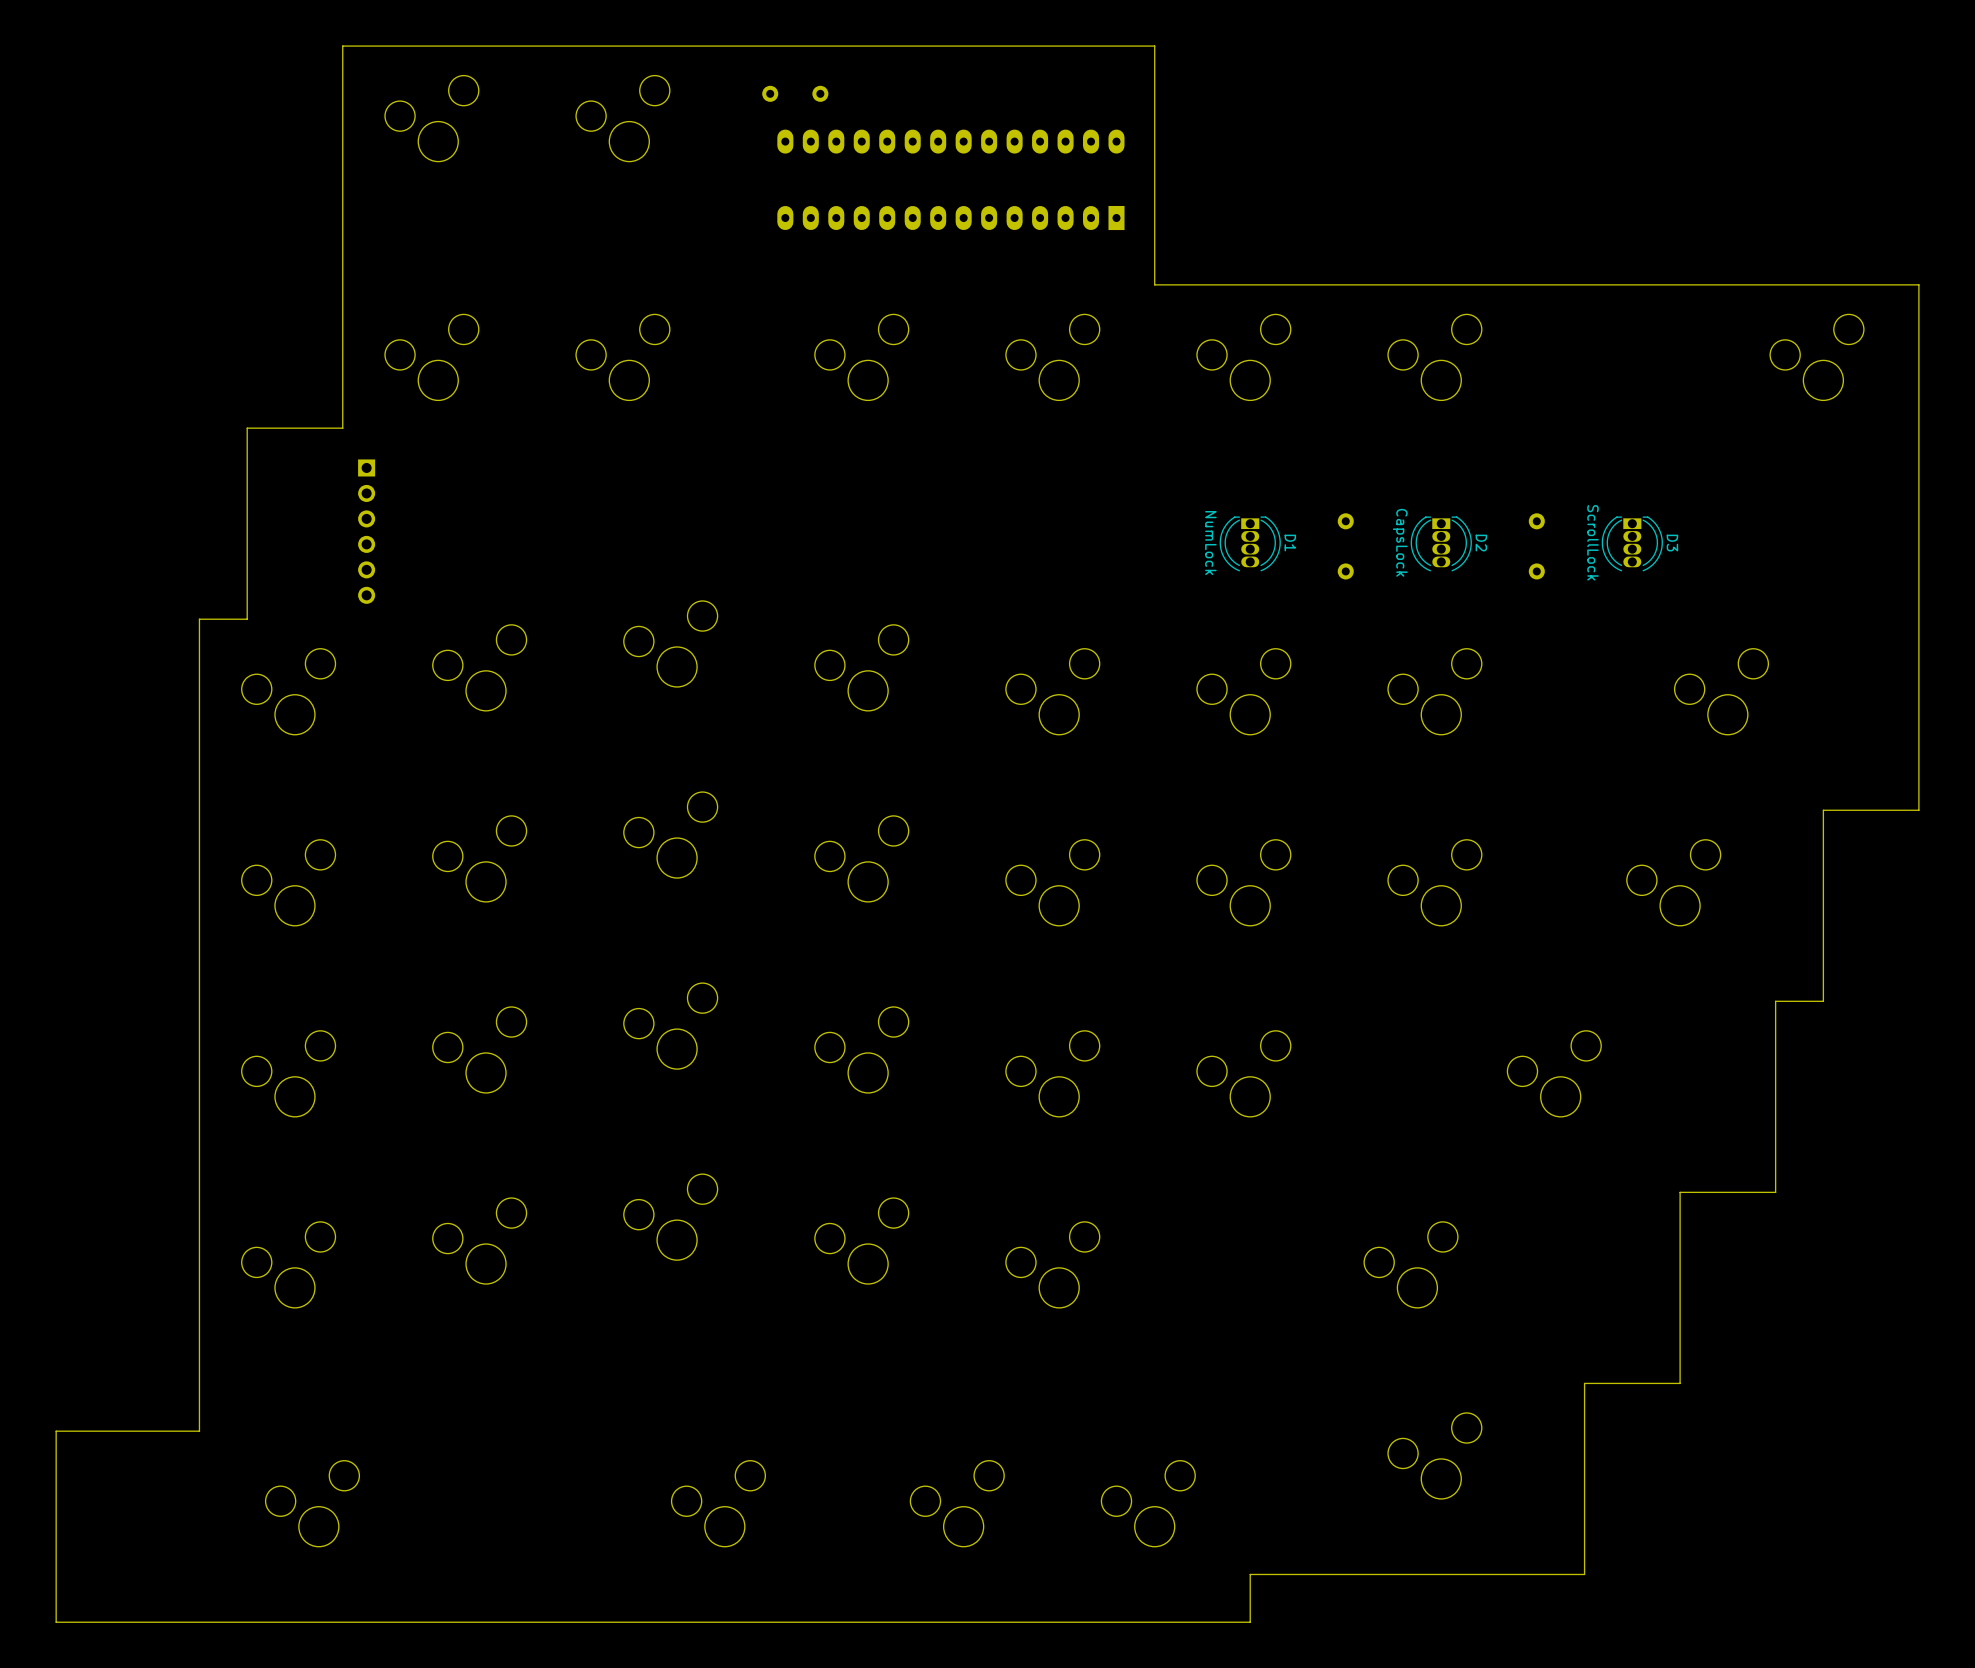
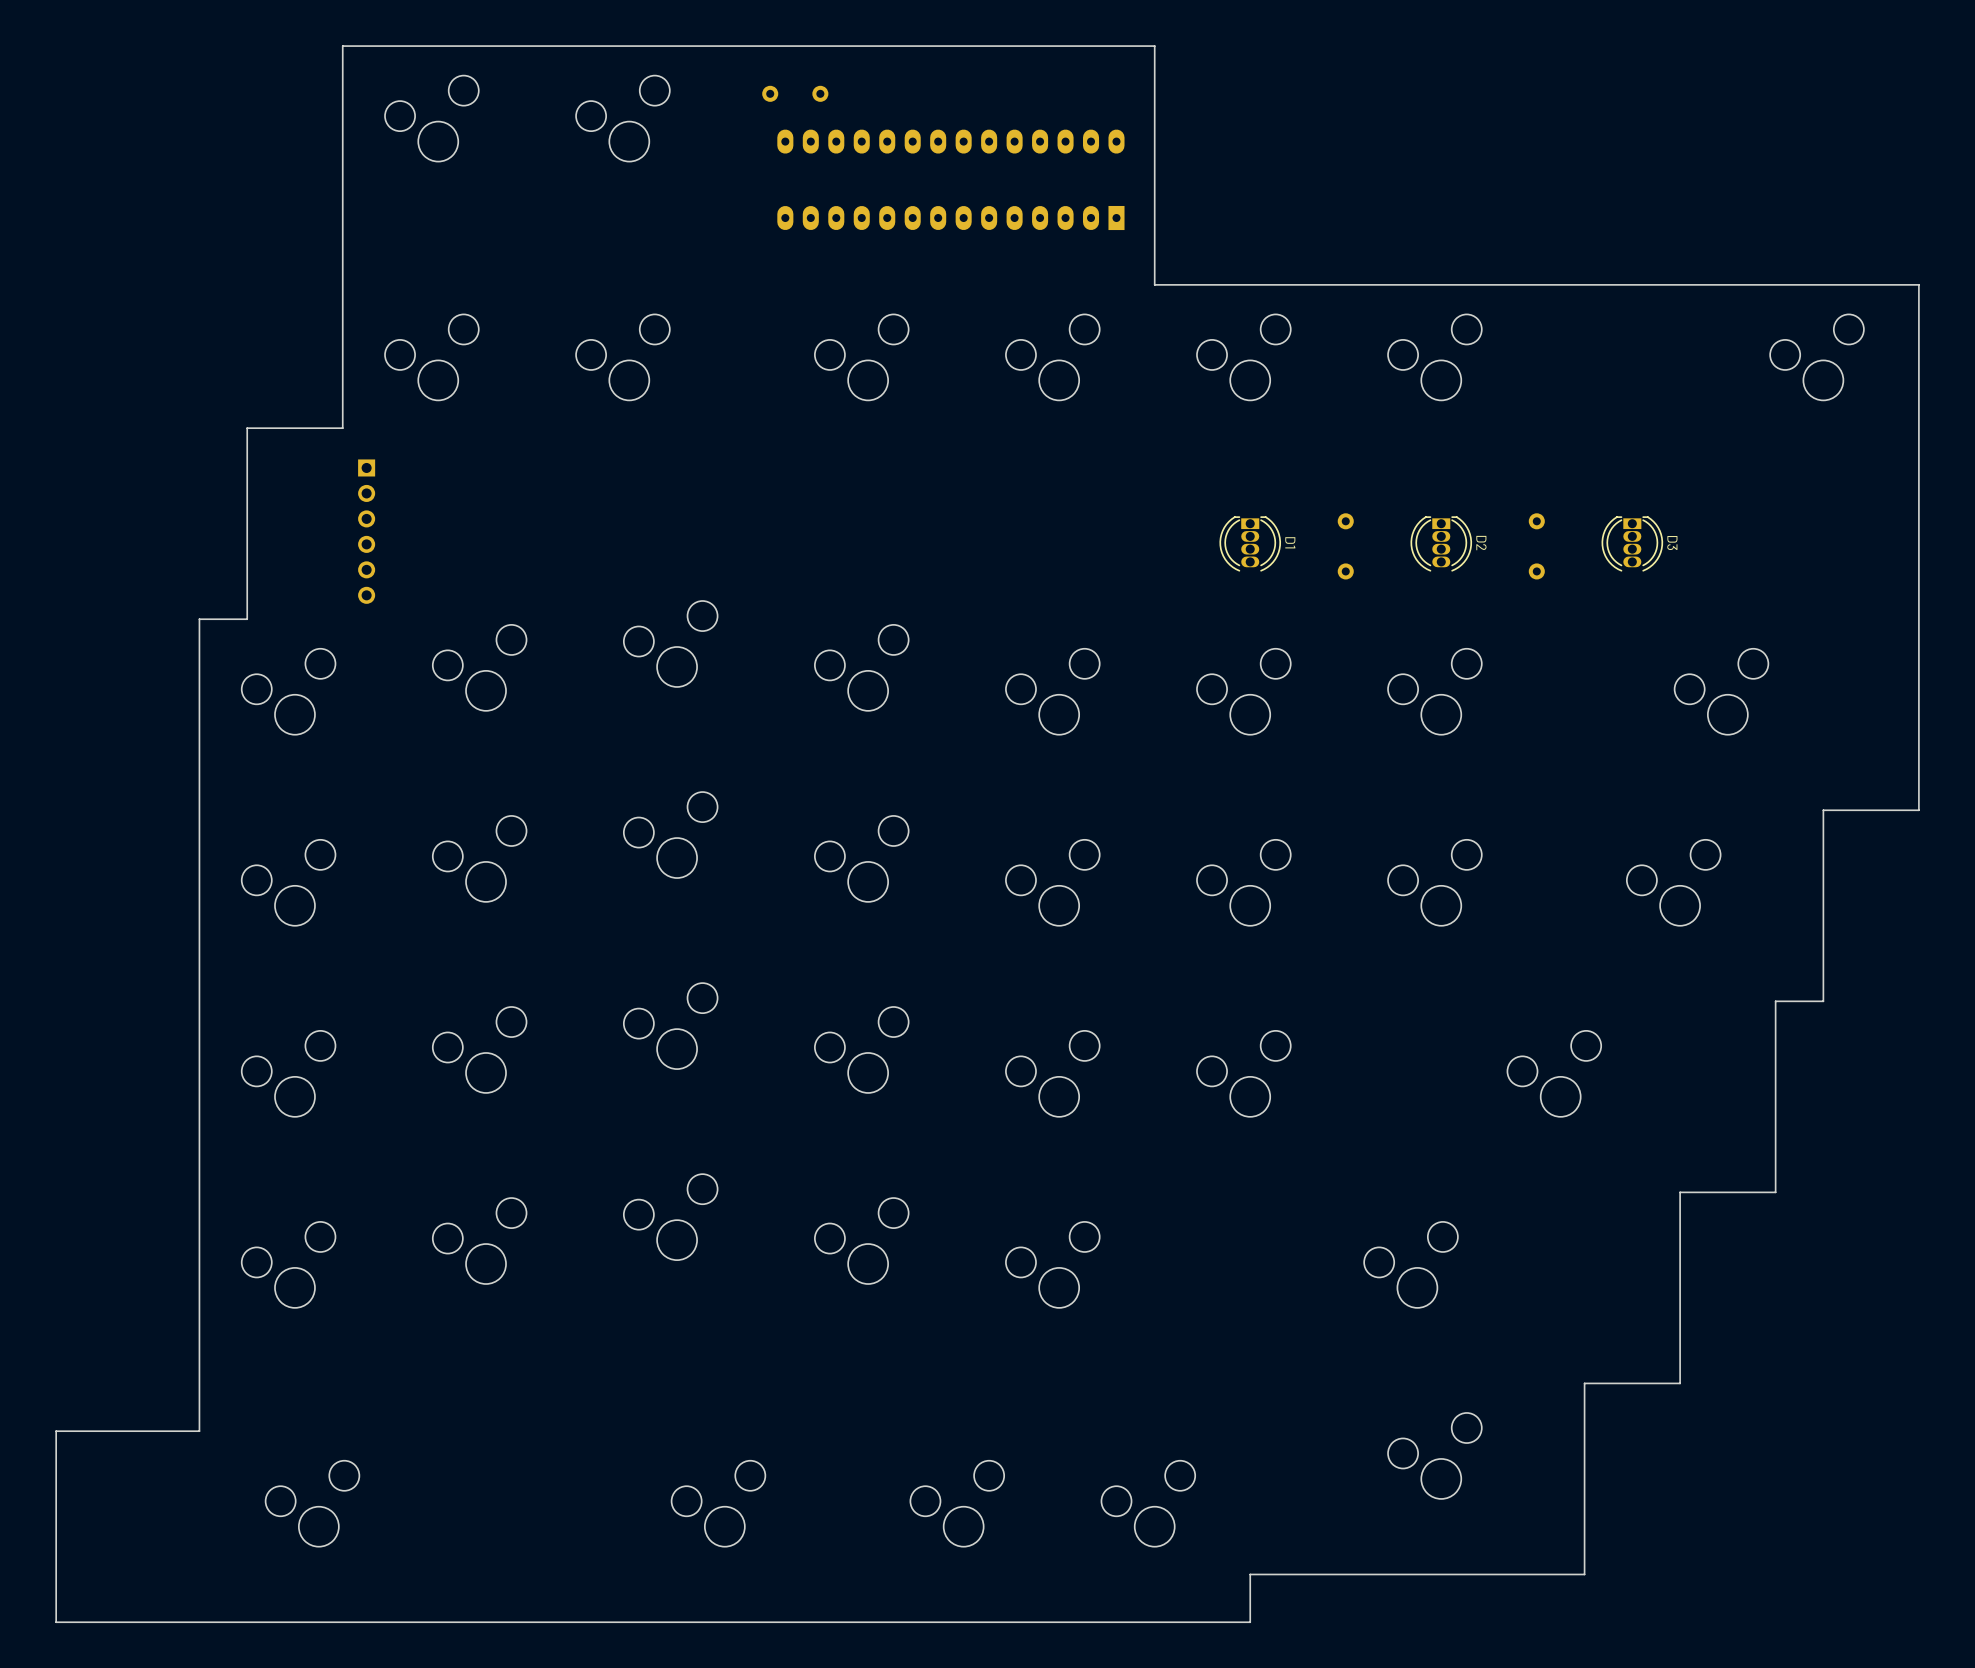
D2 value: CapsLock (1400, 542) -> none
D3 value: ScrollLock (1592, 542) -> none
D1 value: NumLock (1210, 543) -> none

